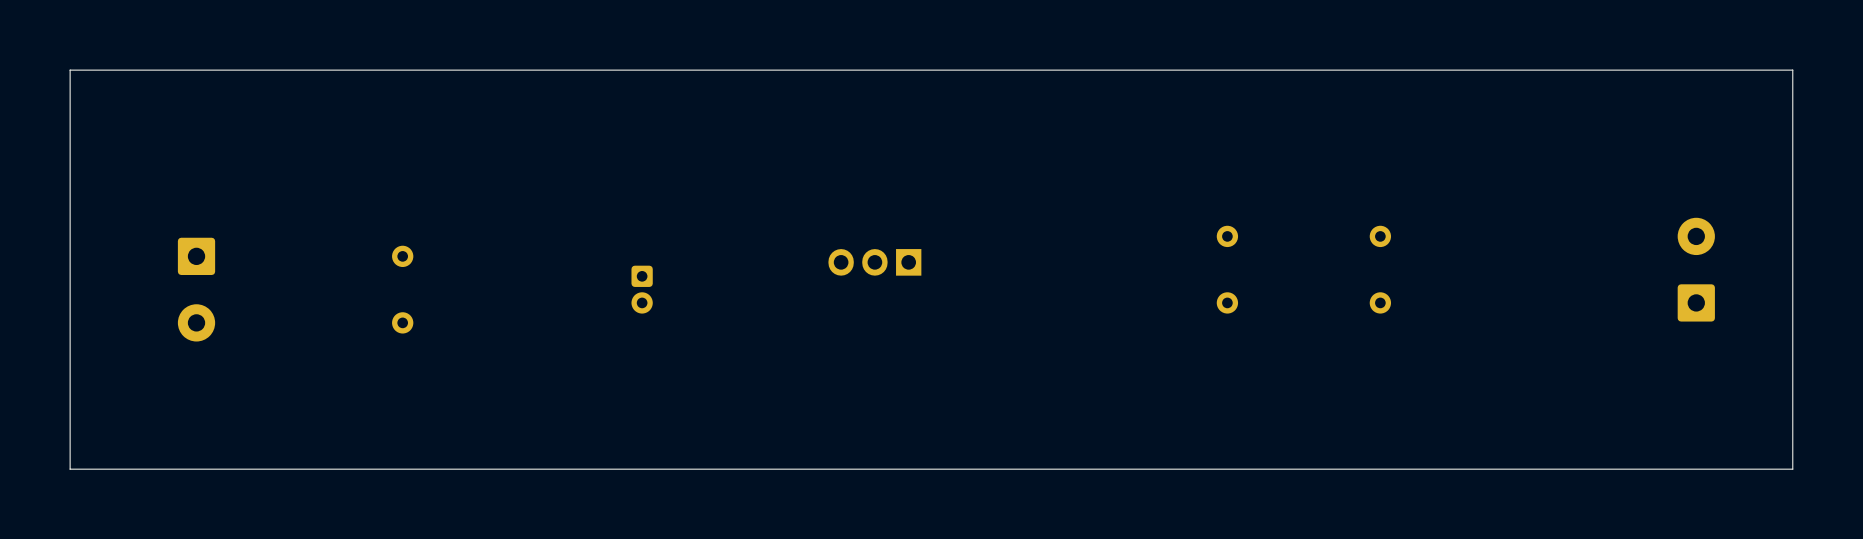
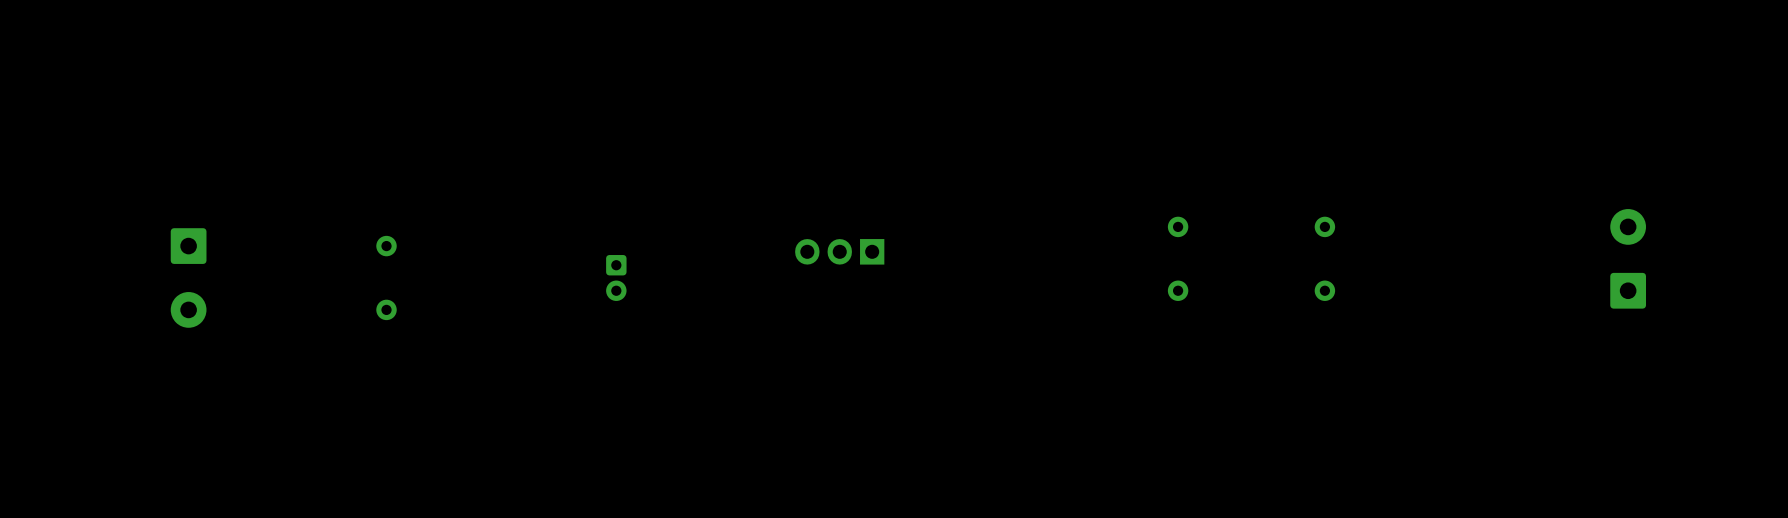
board edge: (1792, 70) (70, 70) (70, 469) (1792, 469) (1792, 70) -> none

